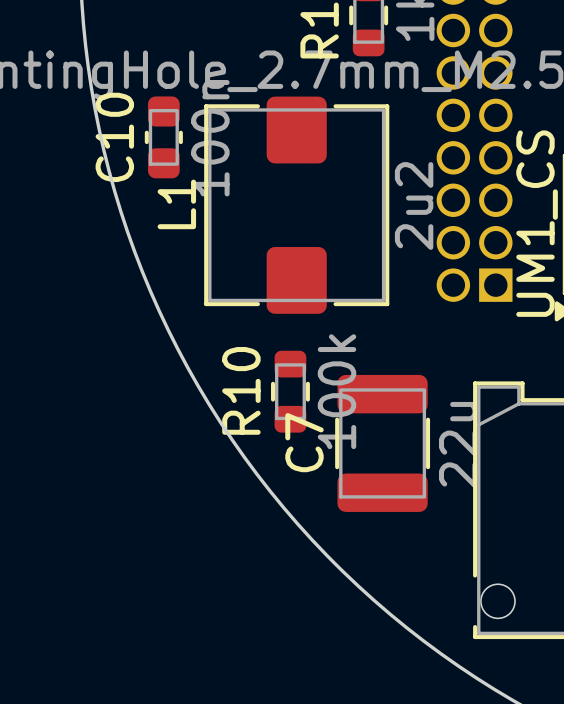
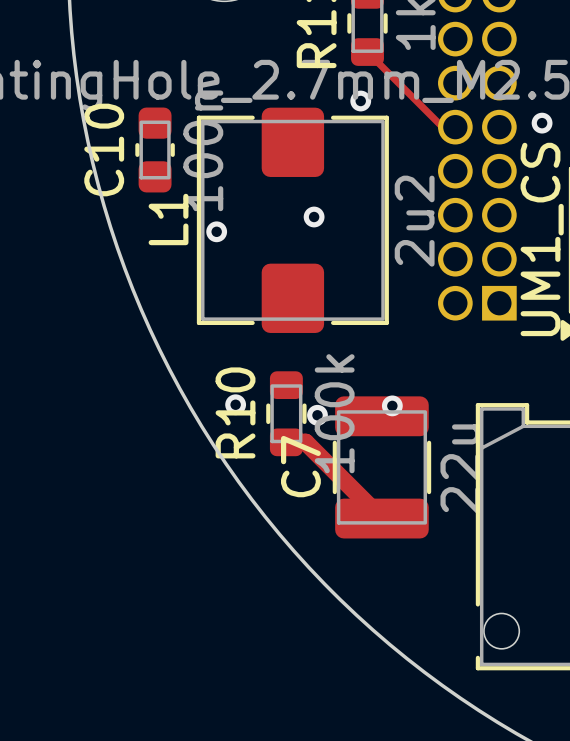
track: none -> (367, 52) (442, 127) (455, 127)
via: none -> (360, 101)
via: none -> (542, 123)
via: none -> (314, 217)
via: none -> (216, 231)
via: none -> (235, 404)
via: none -> (392, 405)
via: none -> (317, 415)
track: none -> (286, 442) (305, 442) (381, 518)

